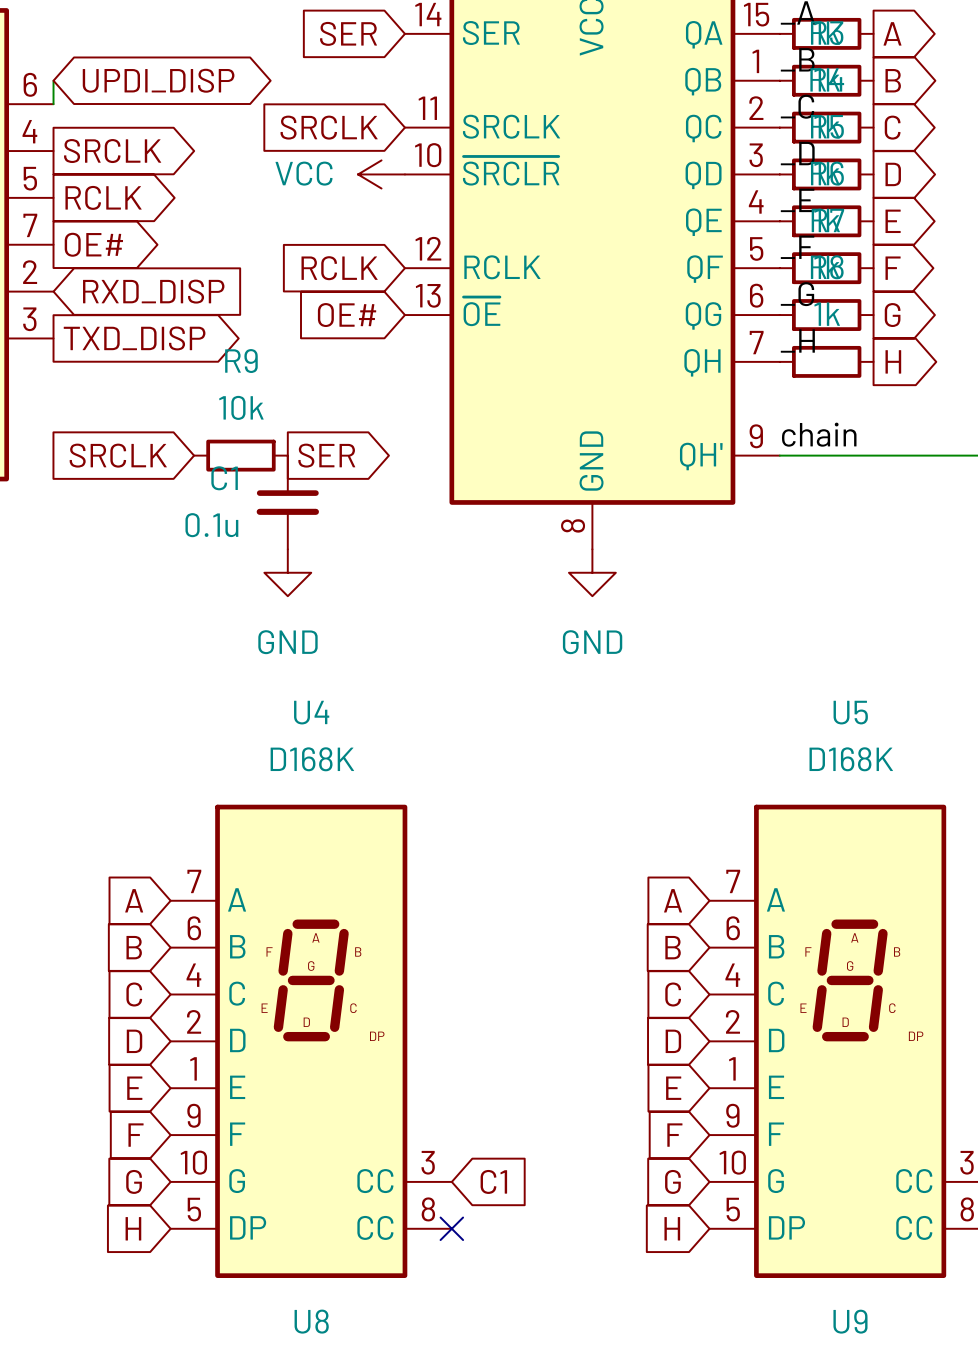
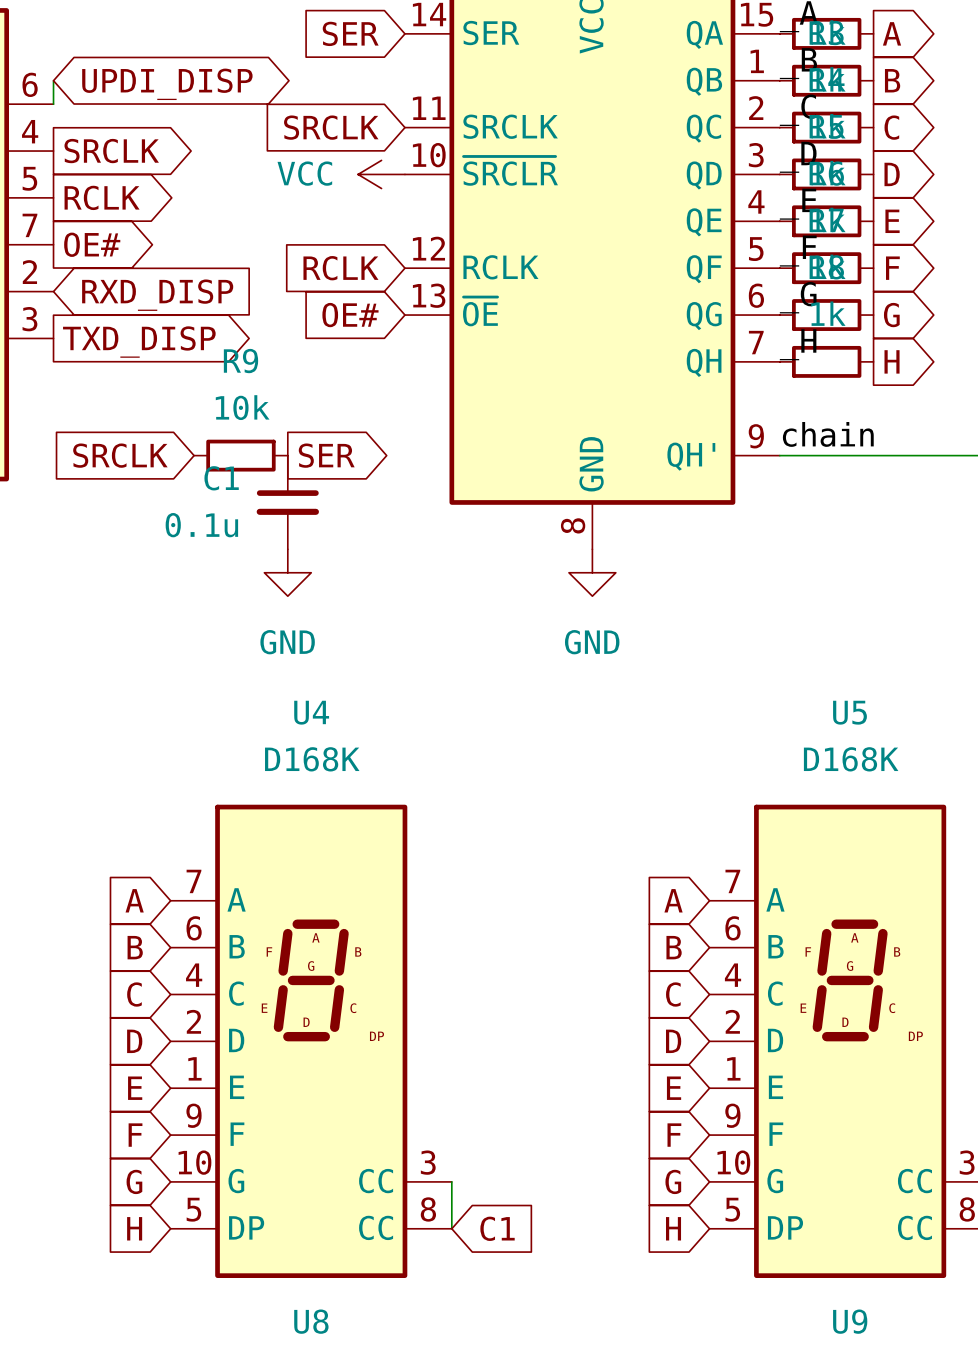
wire: none -> (451, 1181) (451, 1228)
global label position: C1 (493, 1181) -> C1 (497, 1228)
no-connect mark: (451, 1228) -> none

